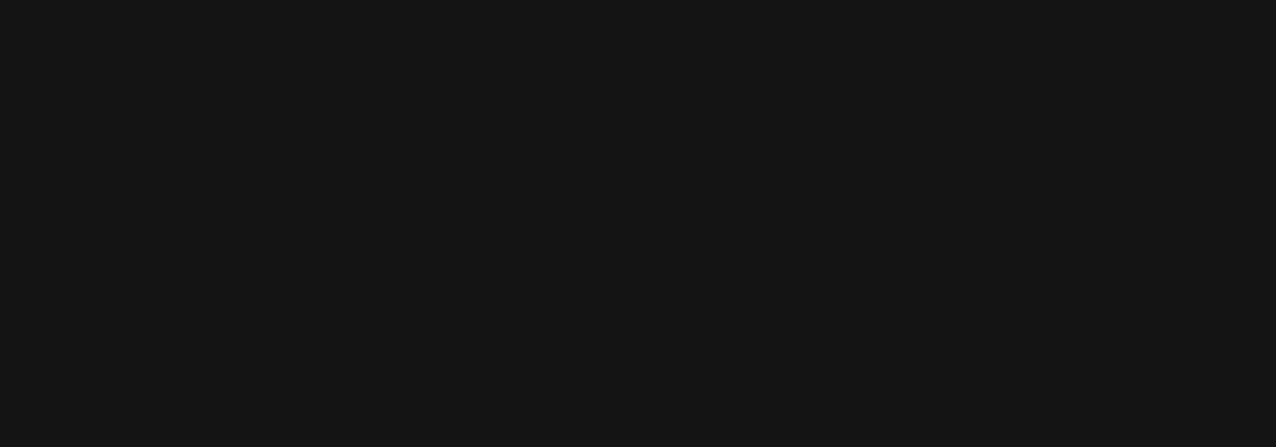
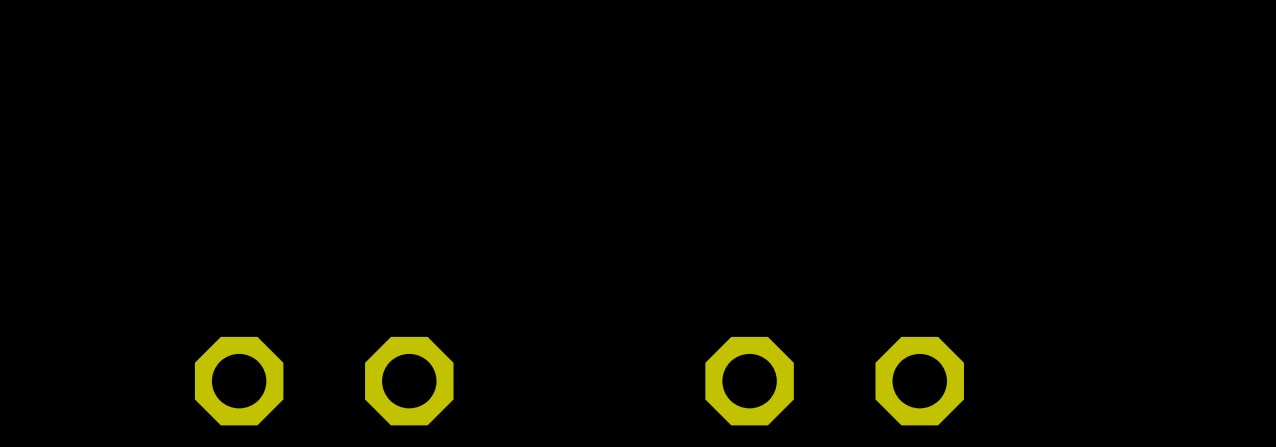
part: none -> (324, 381)
part: none -> (834, 381)

